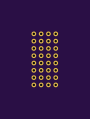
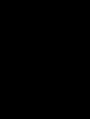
part: (44, 59) -> none

